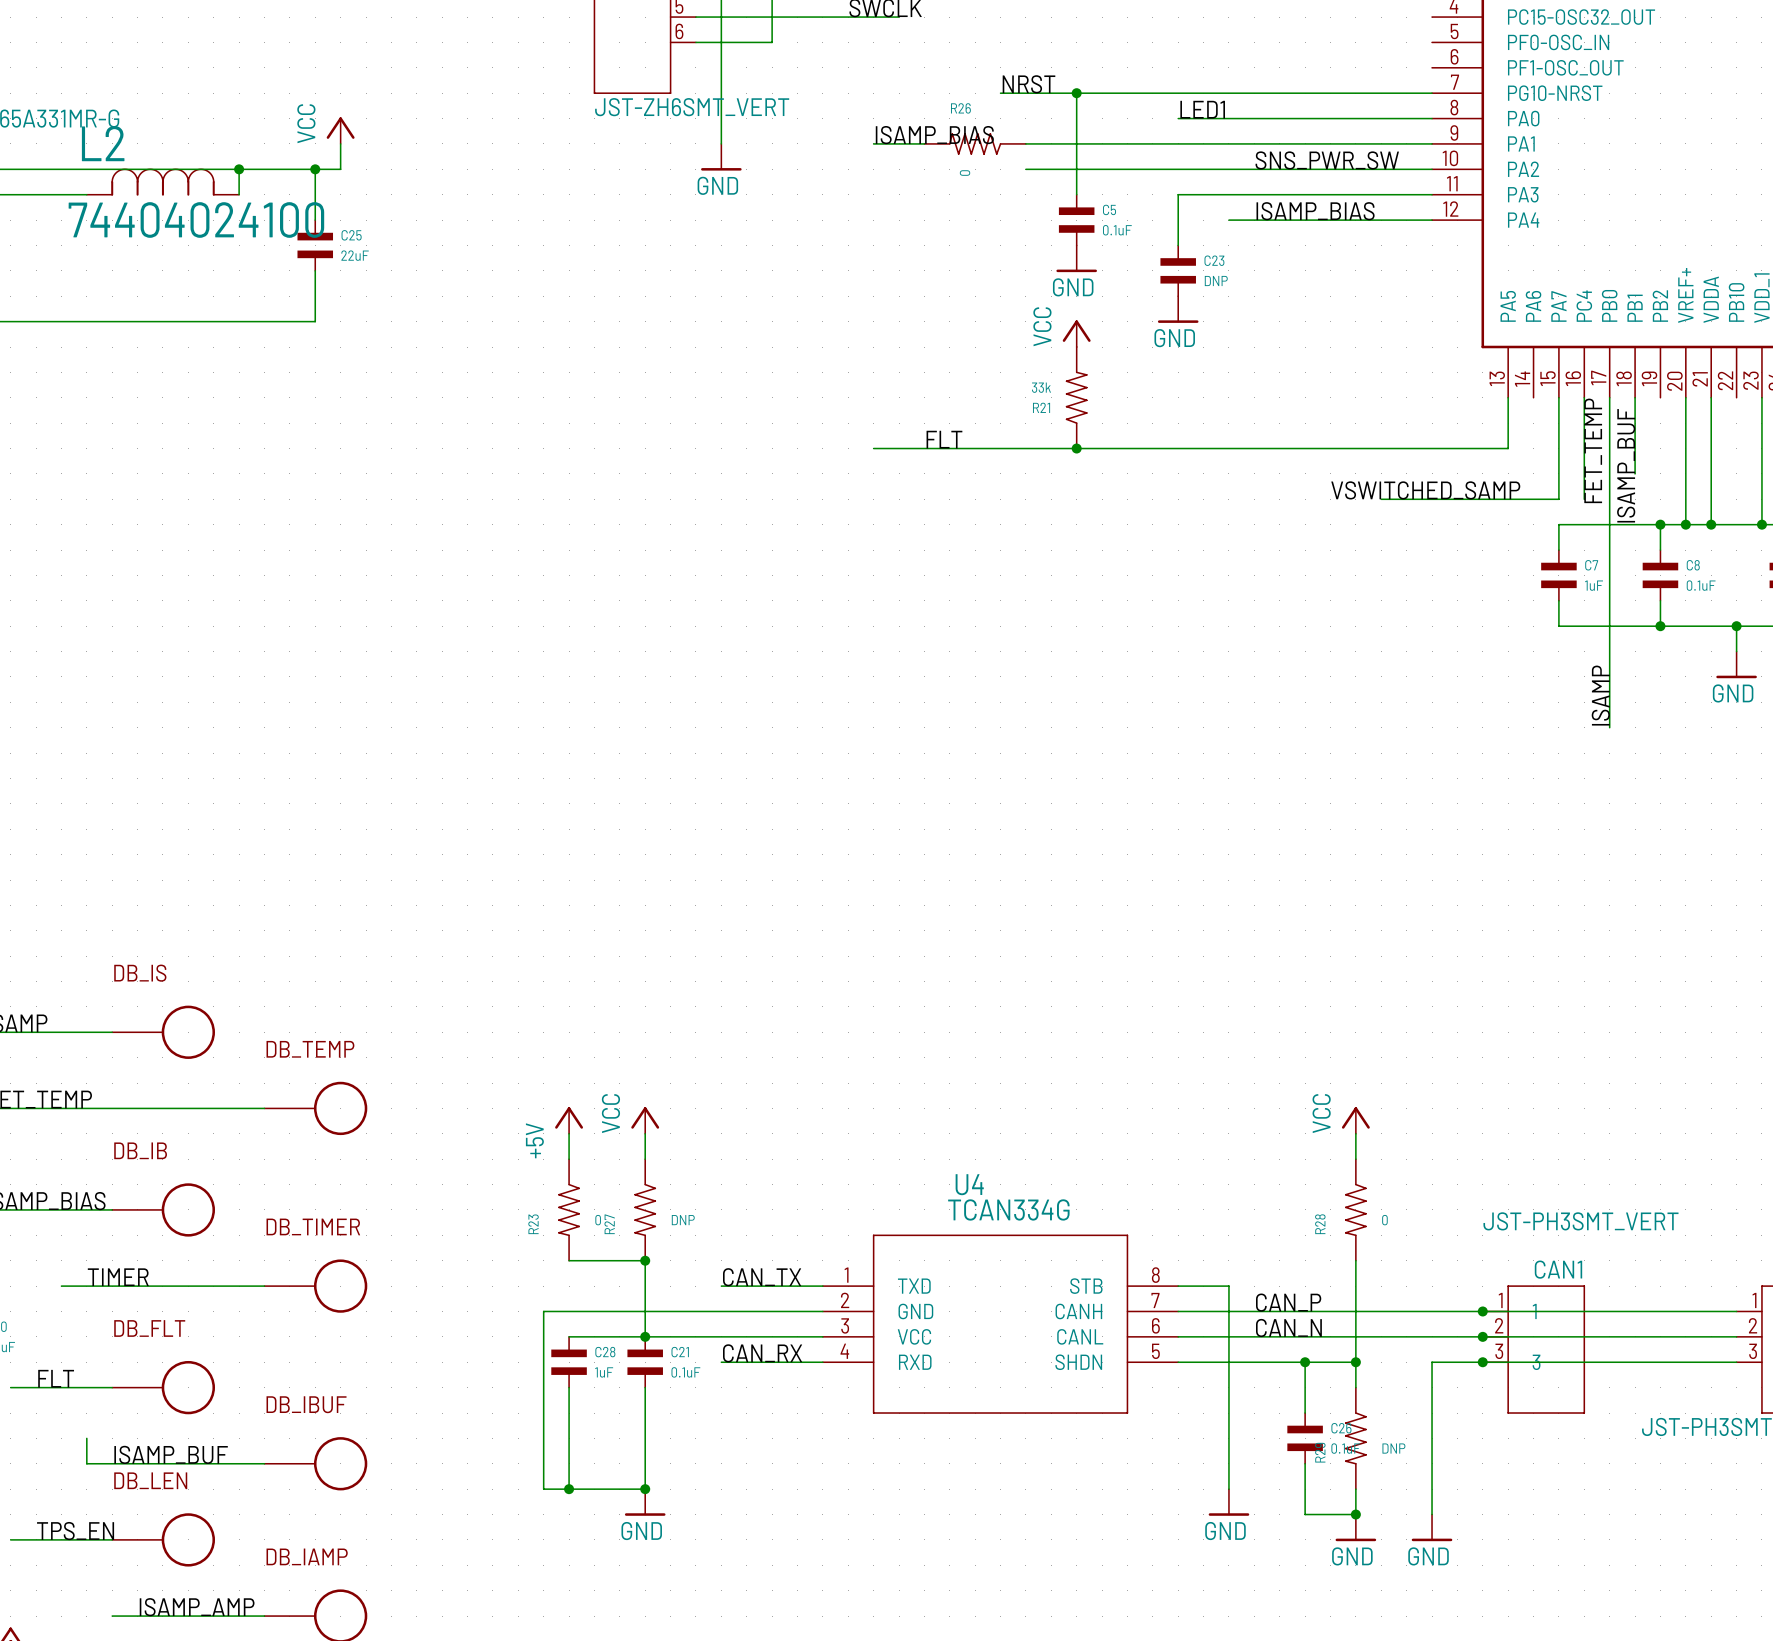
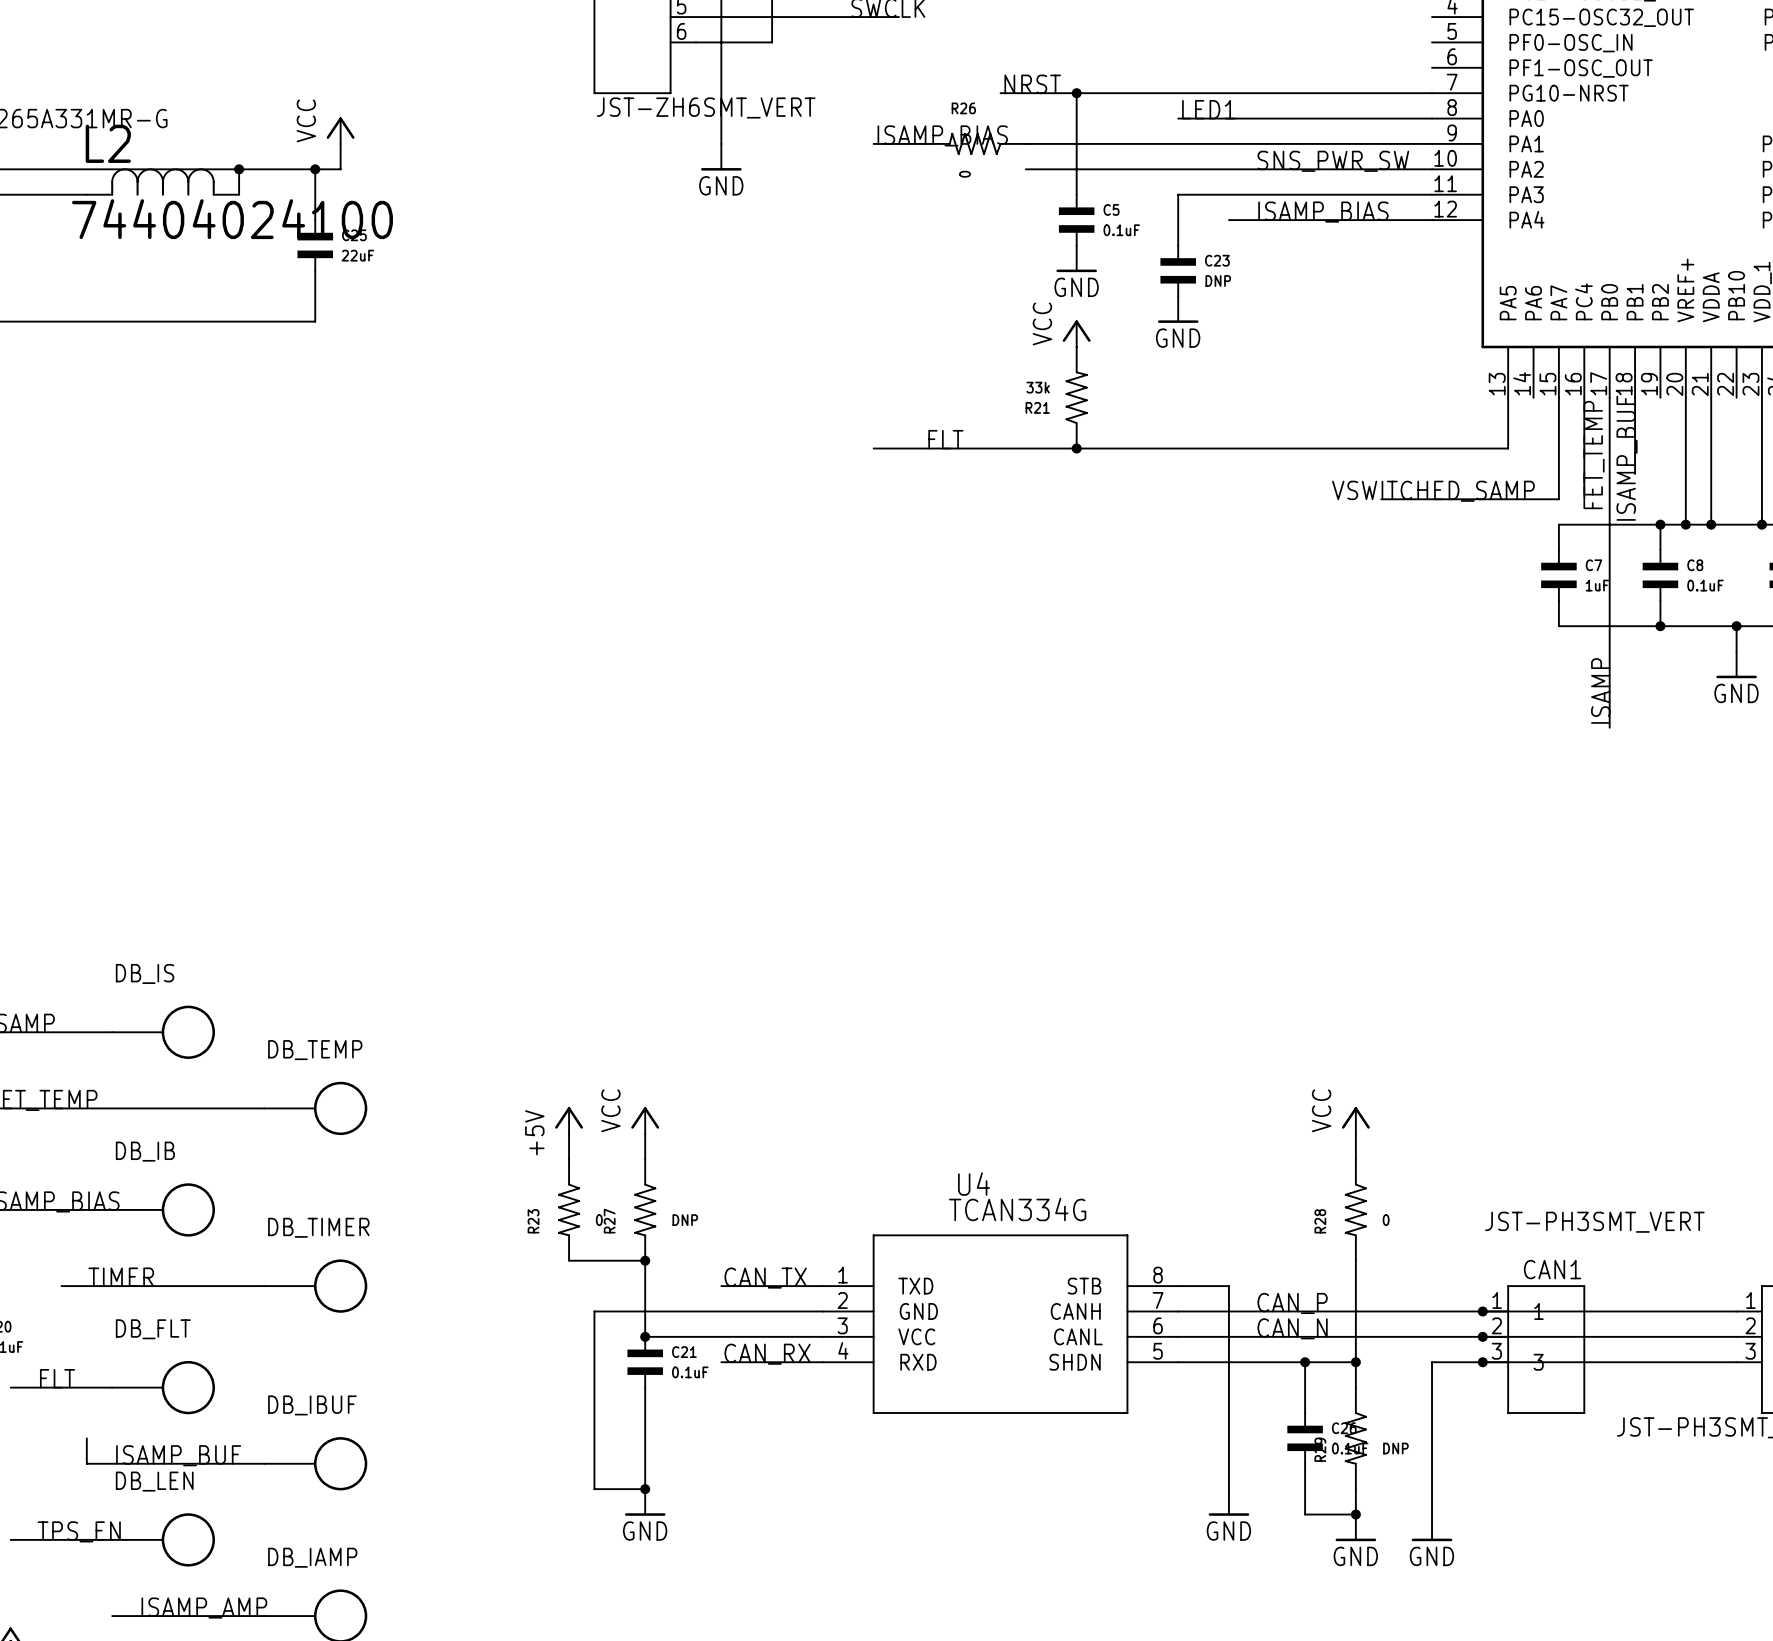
wire: (594, 1311) (543, 1311) (543, 1489) (594, 1489) -> (594, 1311) (594, 1489)
wire: (569, 1336) (645, 1336) -> none
C28: 1uF (569, 1362) -> none
wire: (569, 1387) (569, 1489) -> none
junction: (569, 1489) -> none

